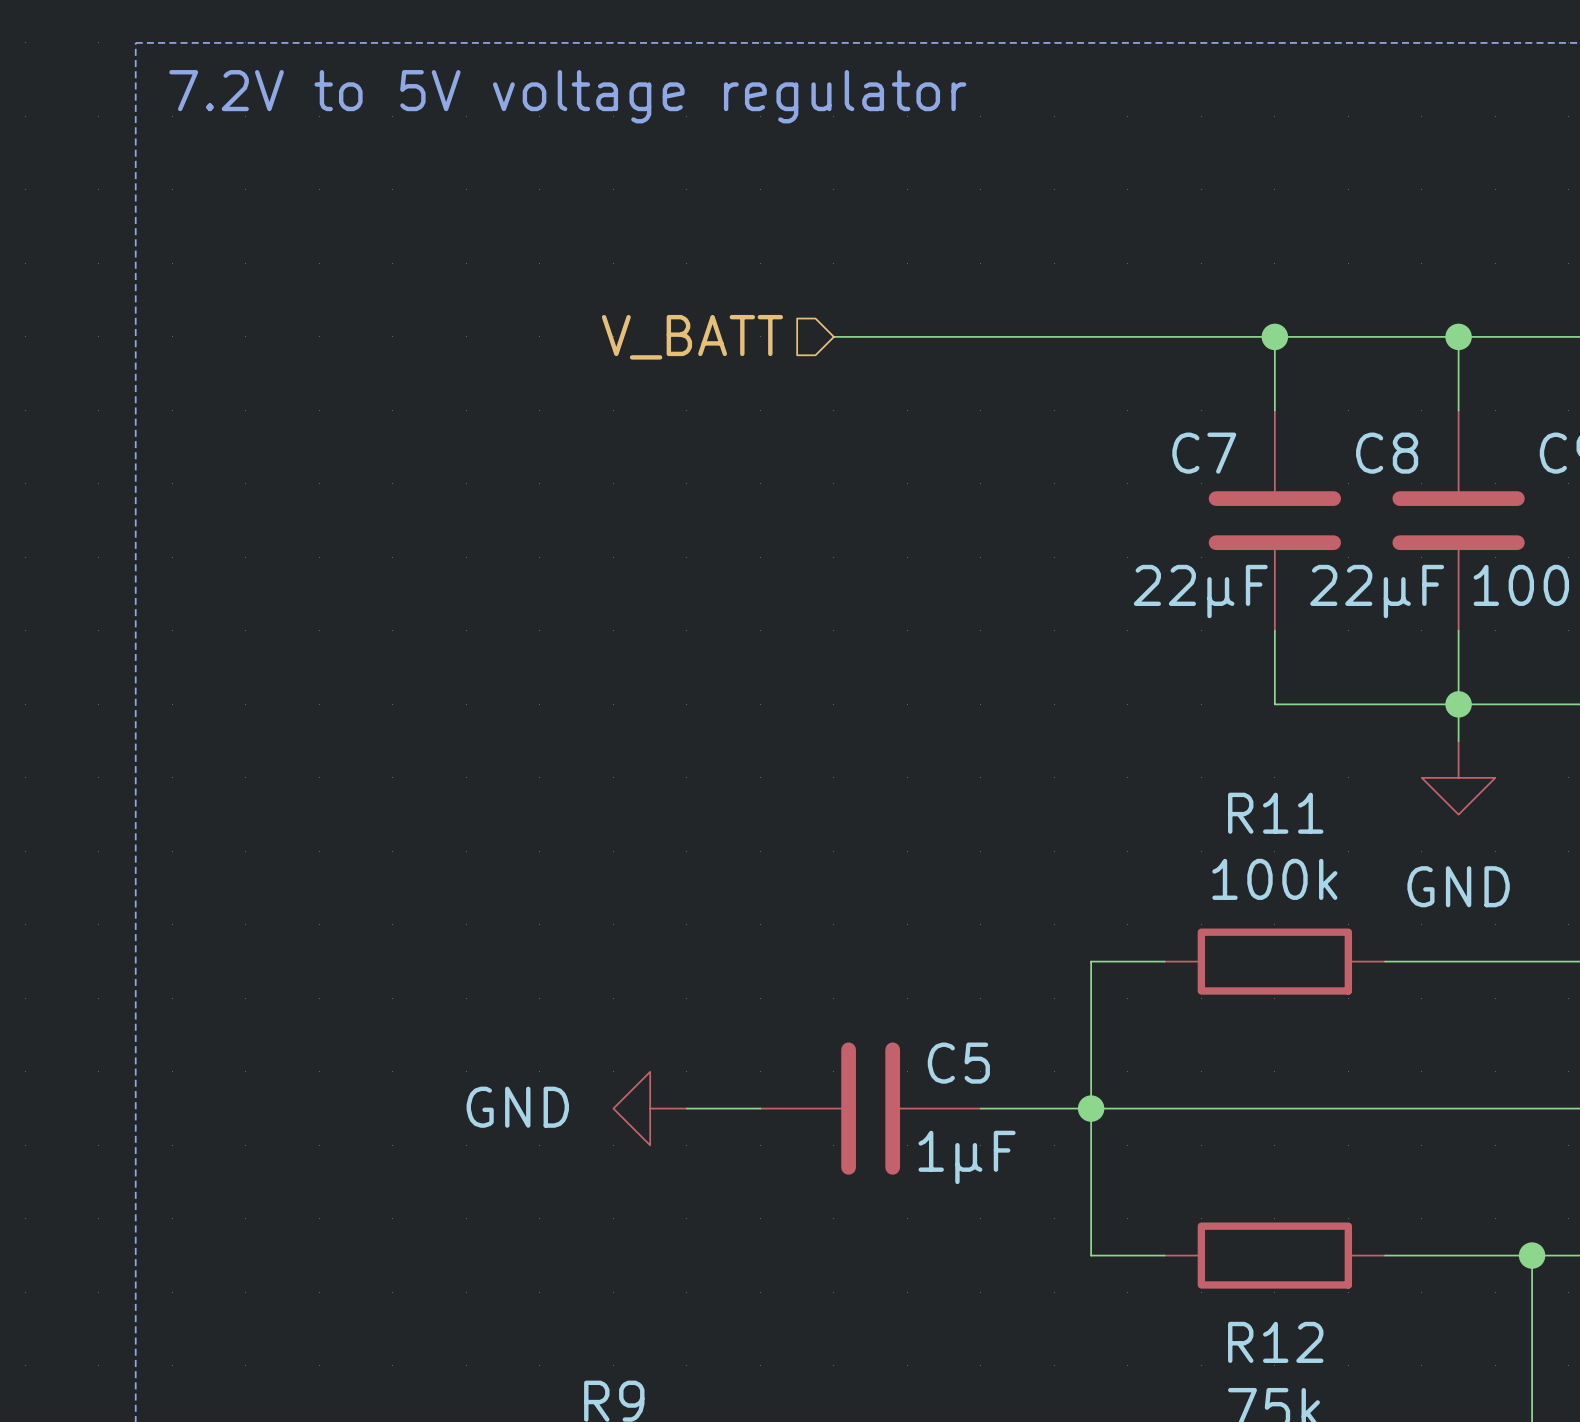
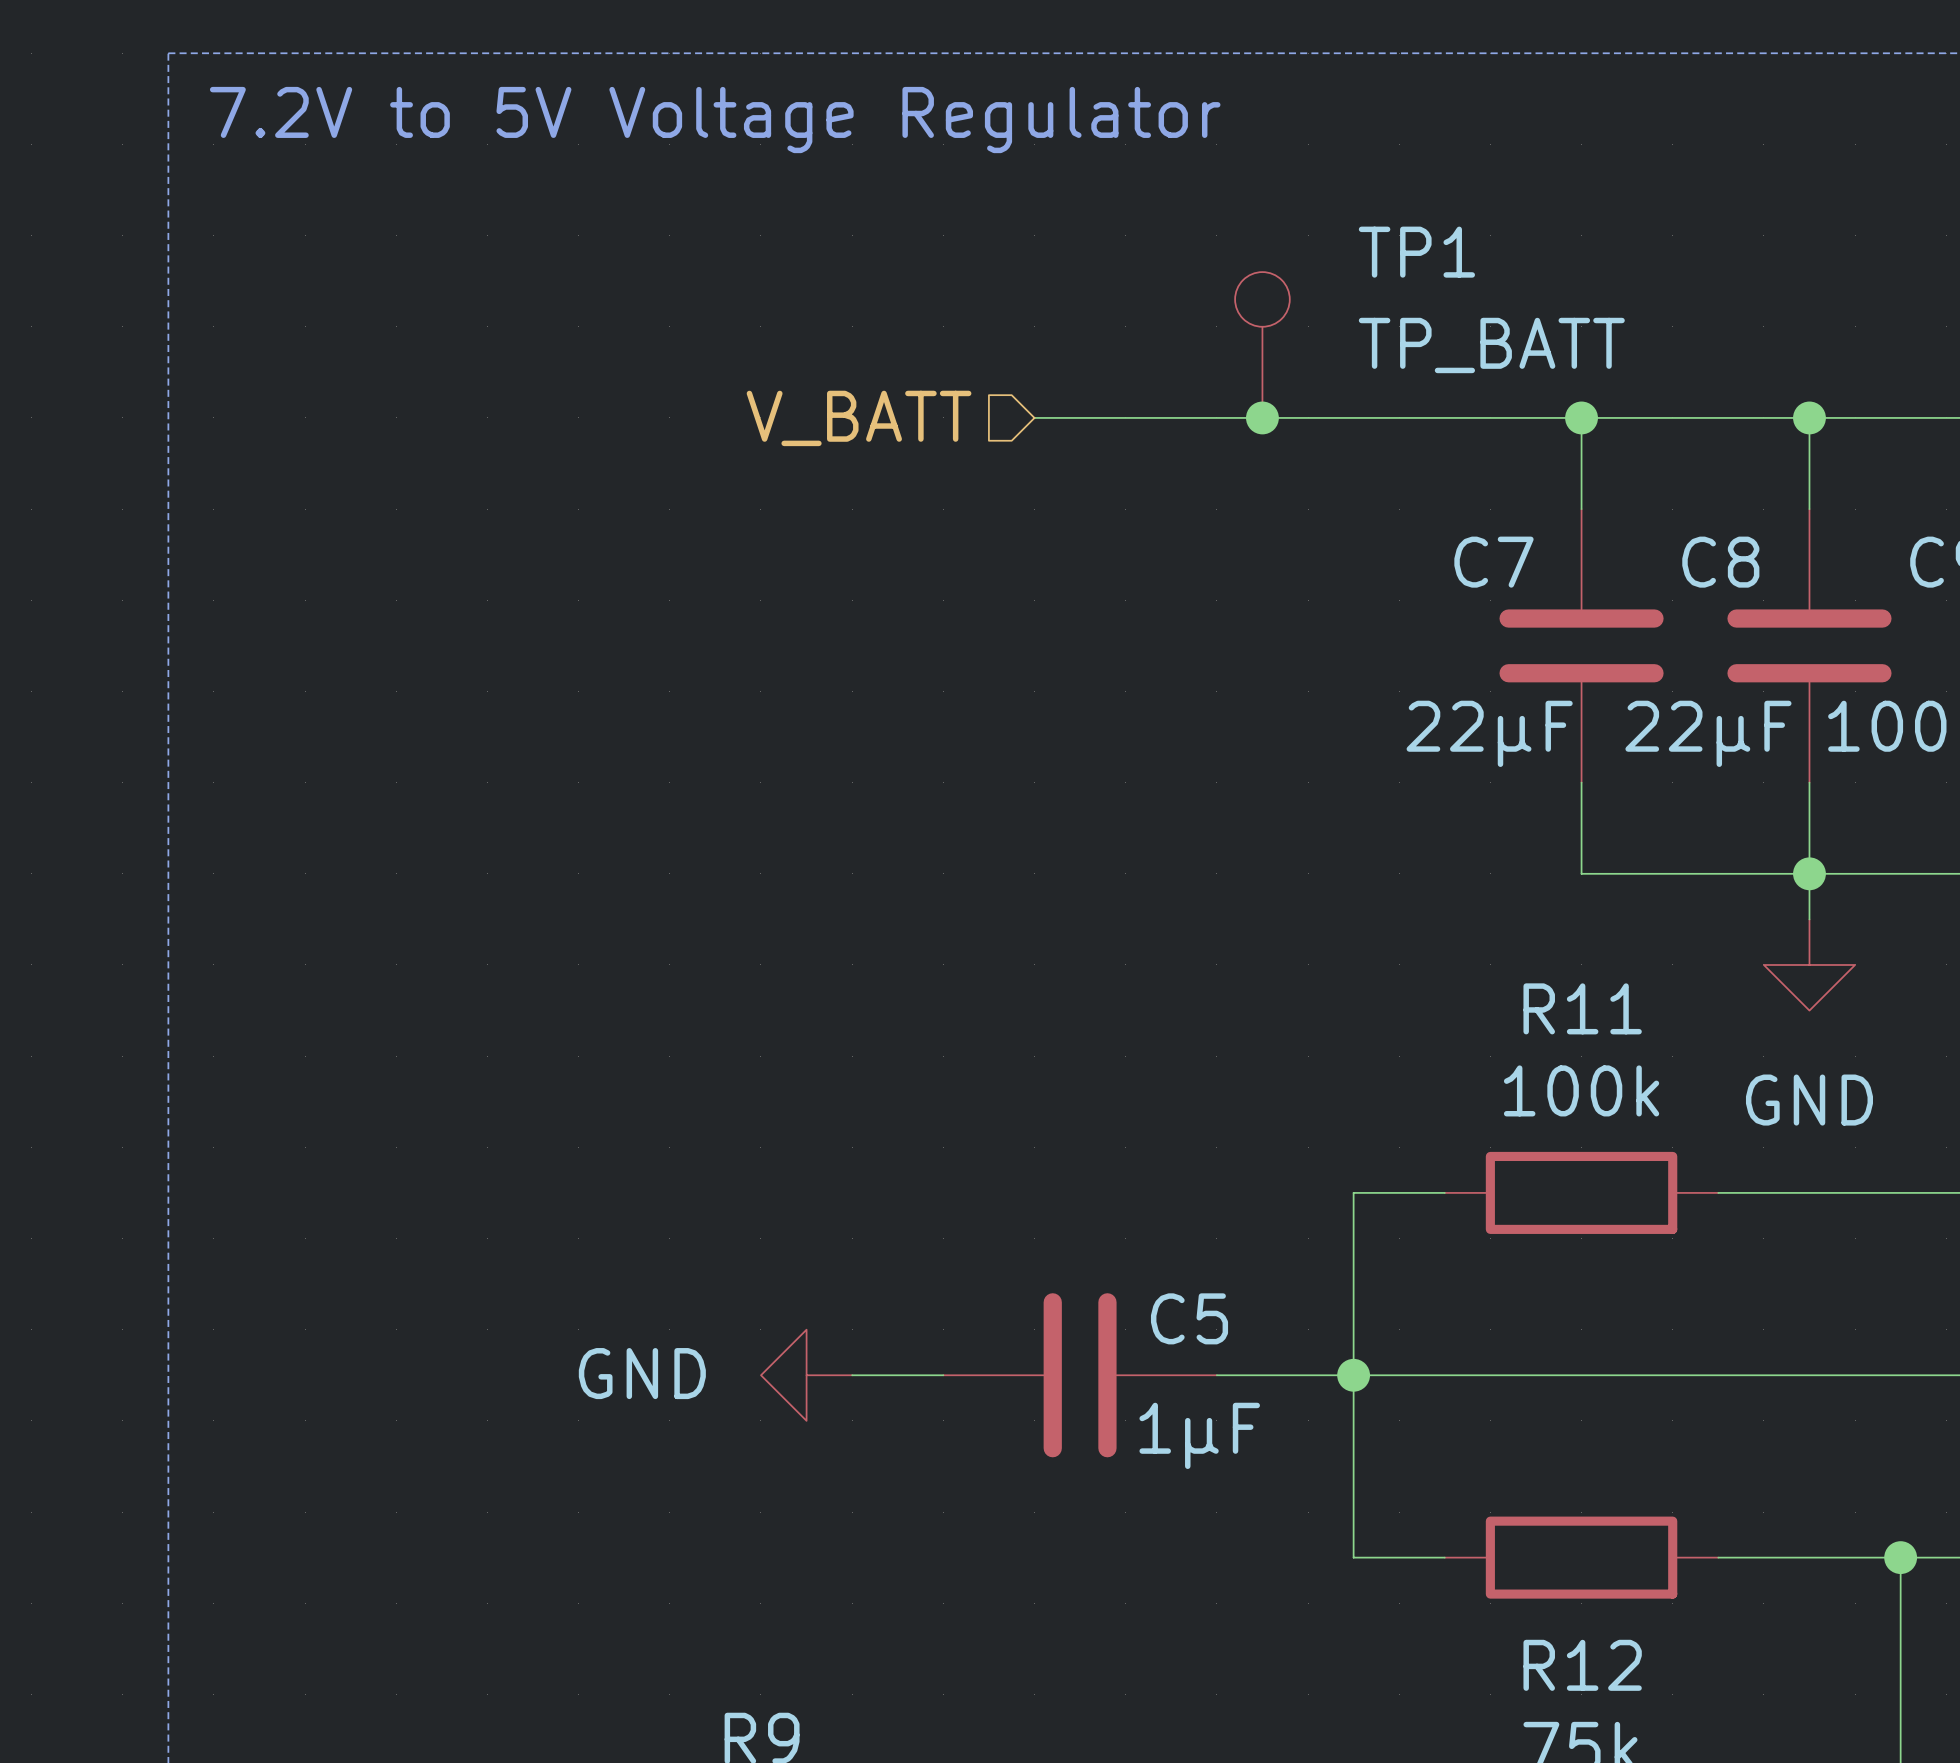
text: 7.2V to 5V voltage regulator (567, 96) -> 7.2V to 5V Voltage Regulator (715, 120)
TP1: none -> TP_BATT (1262, 345)
junction: none -> (1262, 417)

